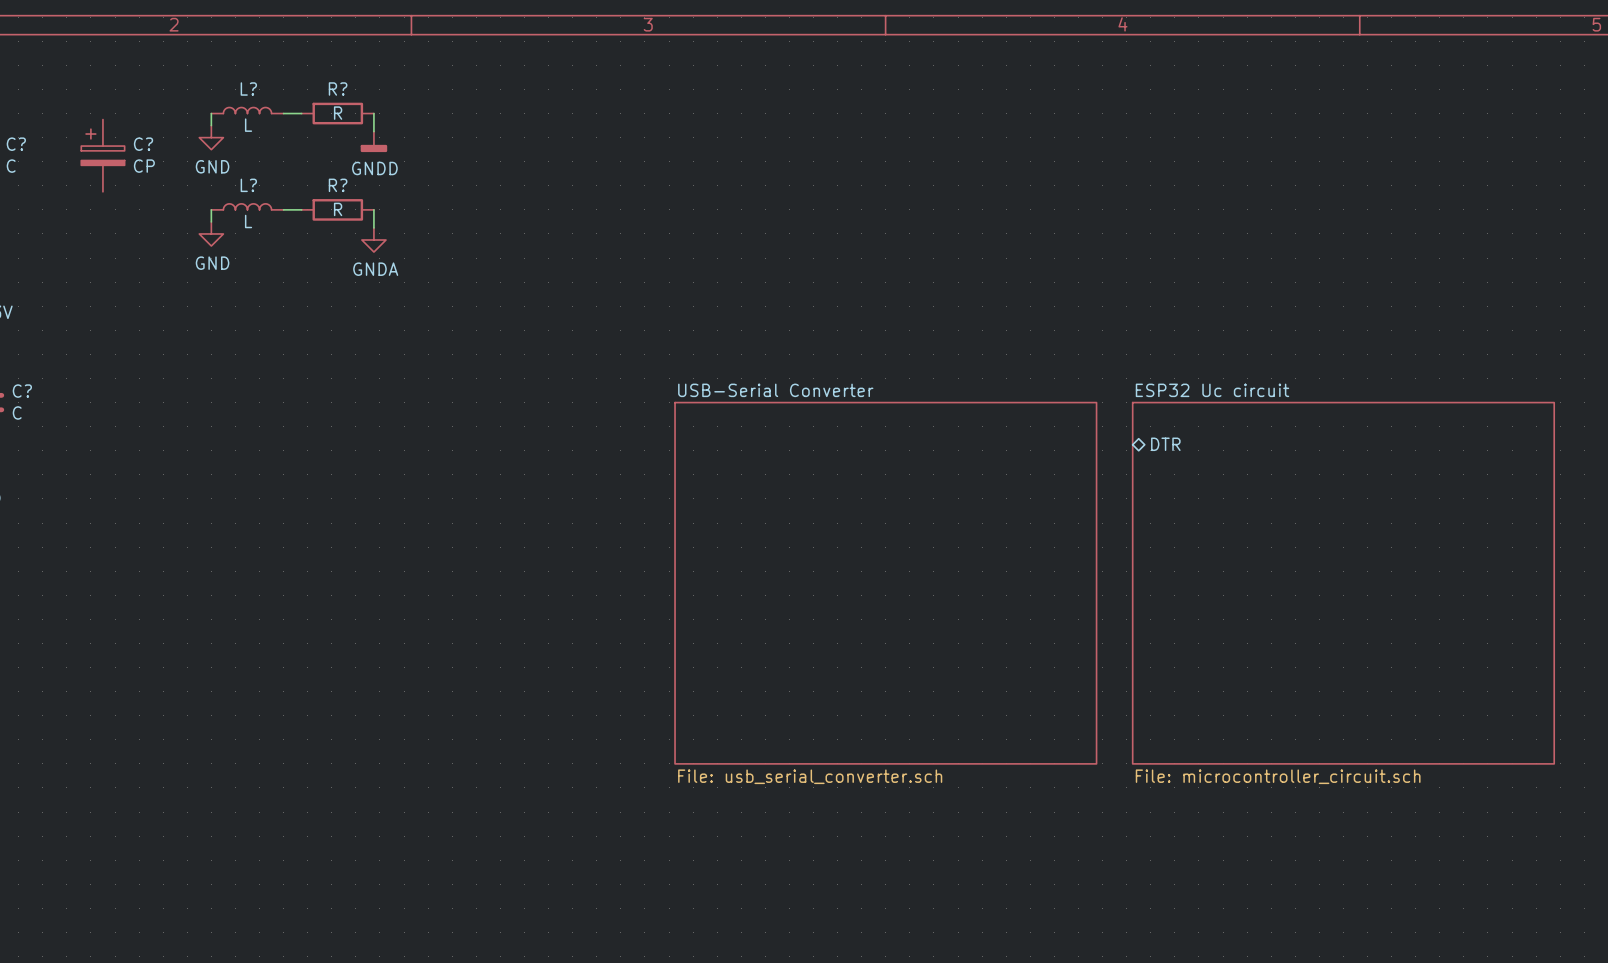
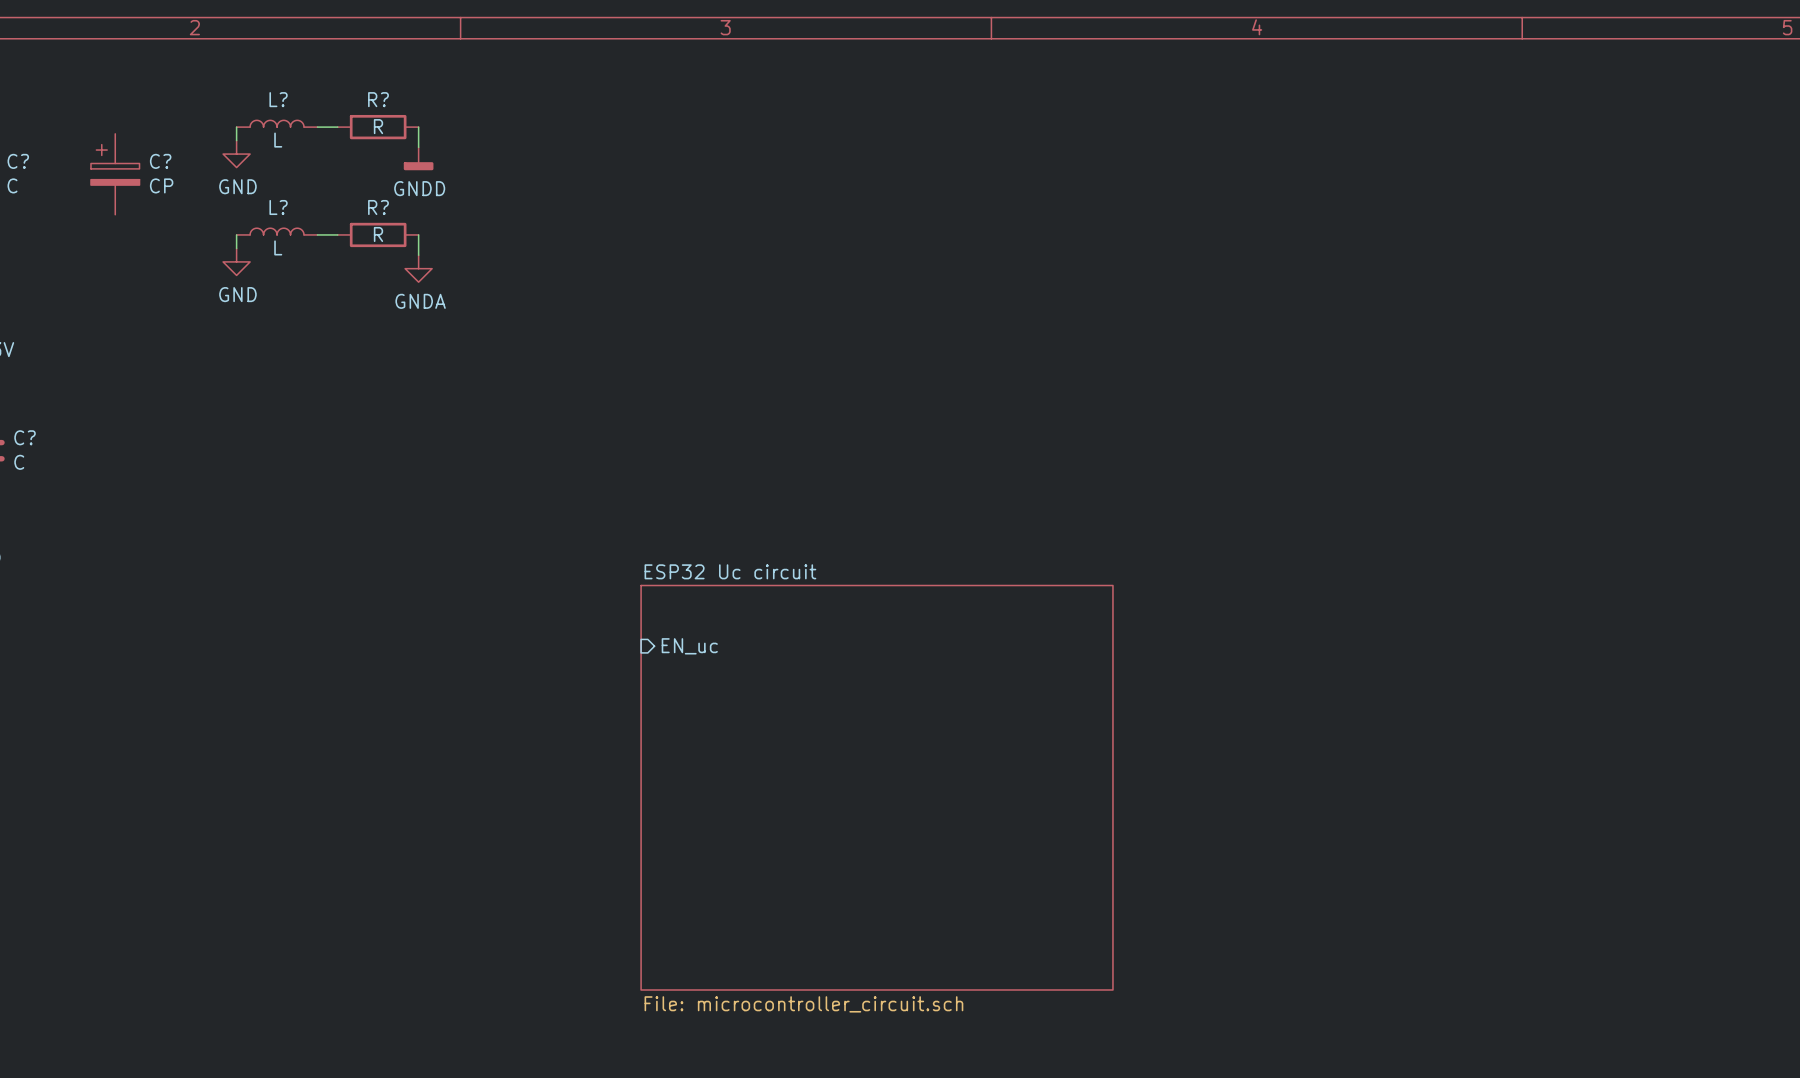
sheet pin: DTR (1165, 444) -> none
sheet pin: none -> EN_uc (689, 646)
sheet USB-Serial Converter: File: usb_serial_converter.sch (885, 583) -> none
sheet ESP32 Uc circuit position: (1343, 583) -> (877, 787)

